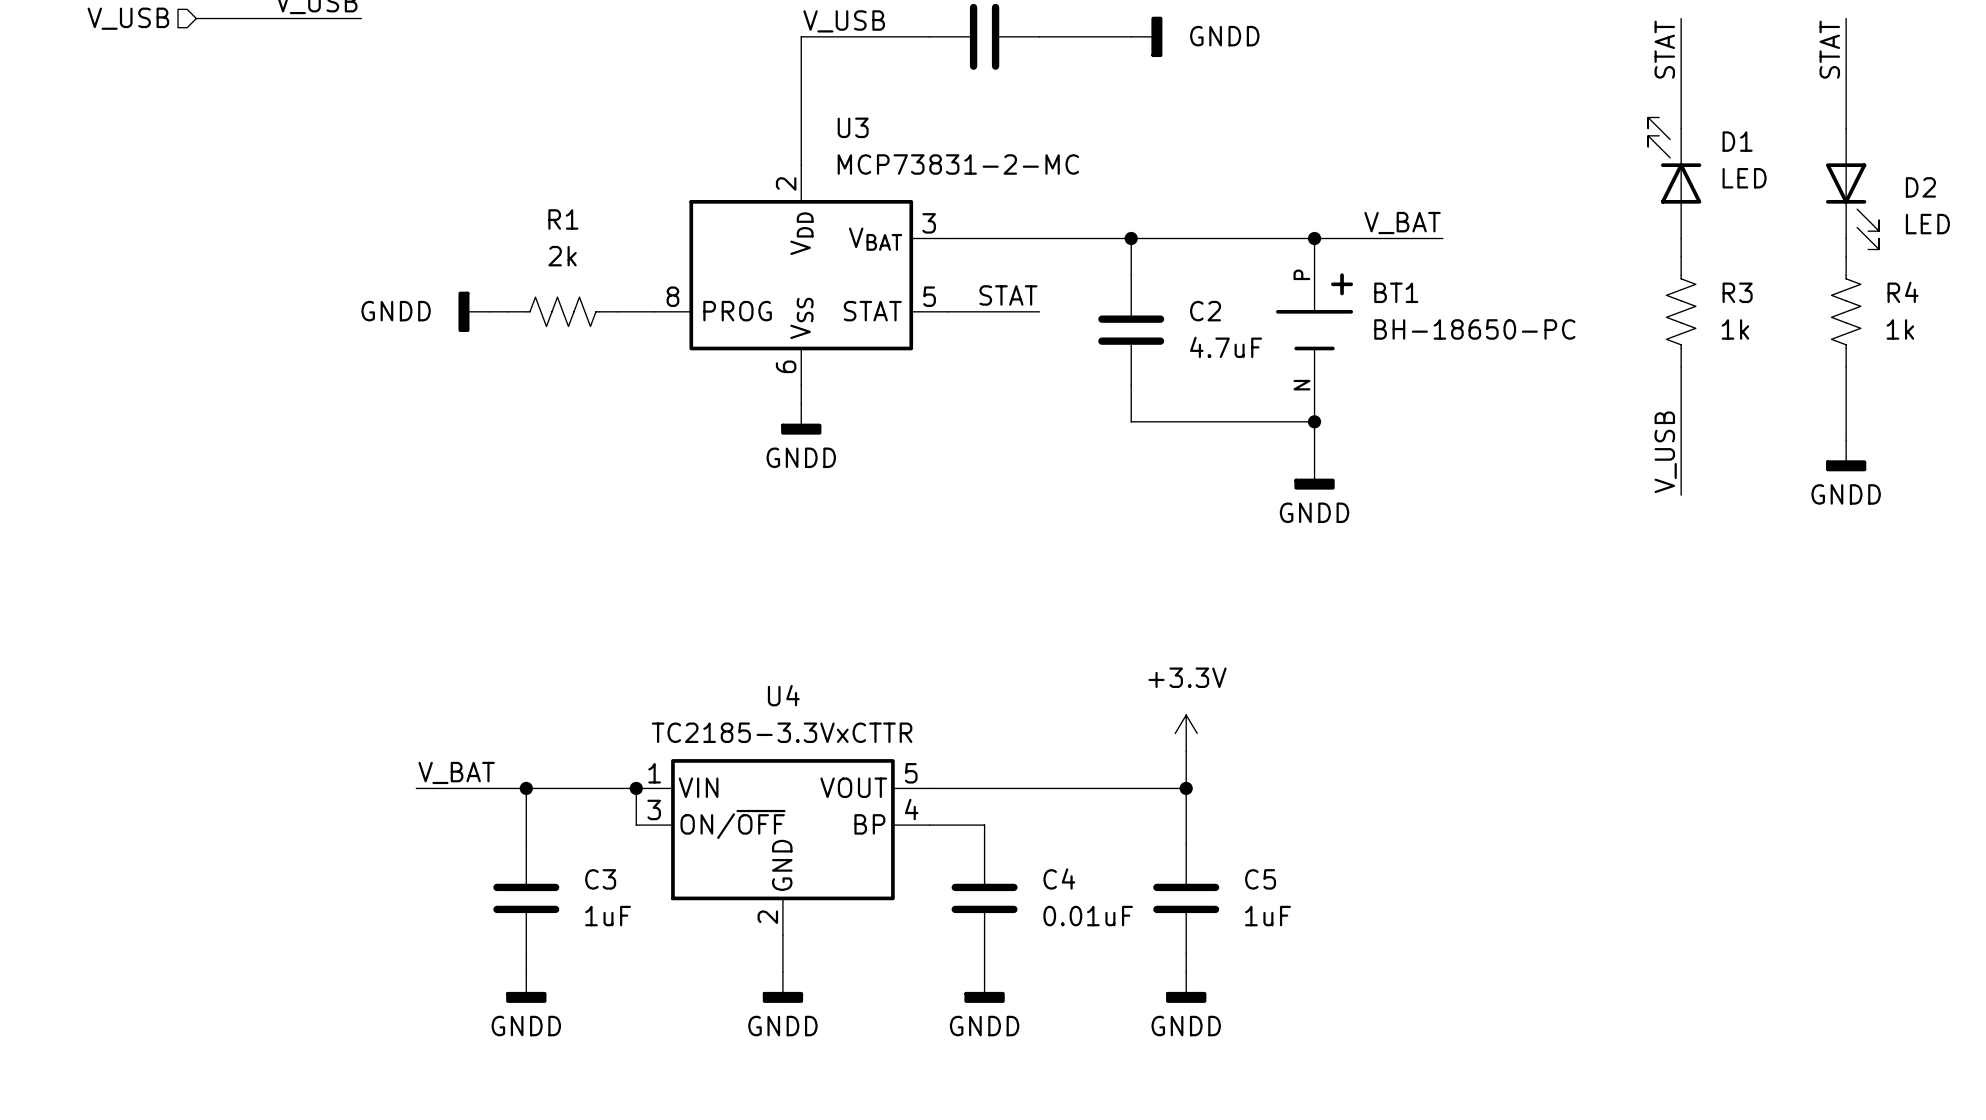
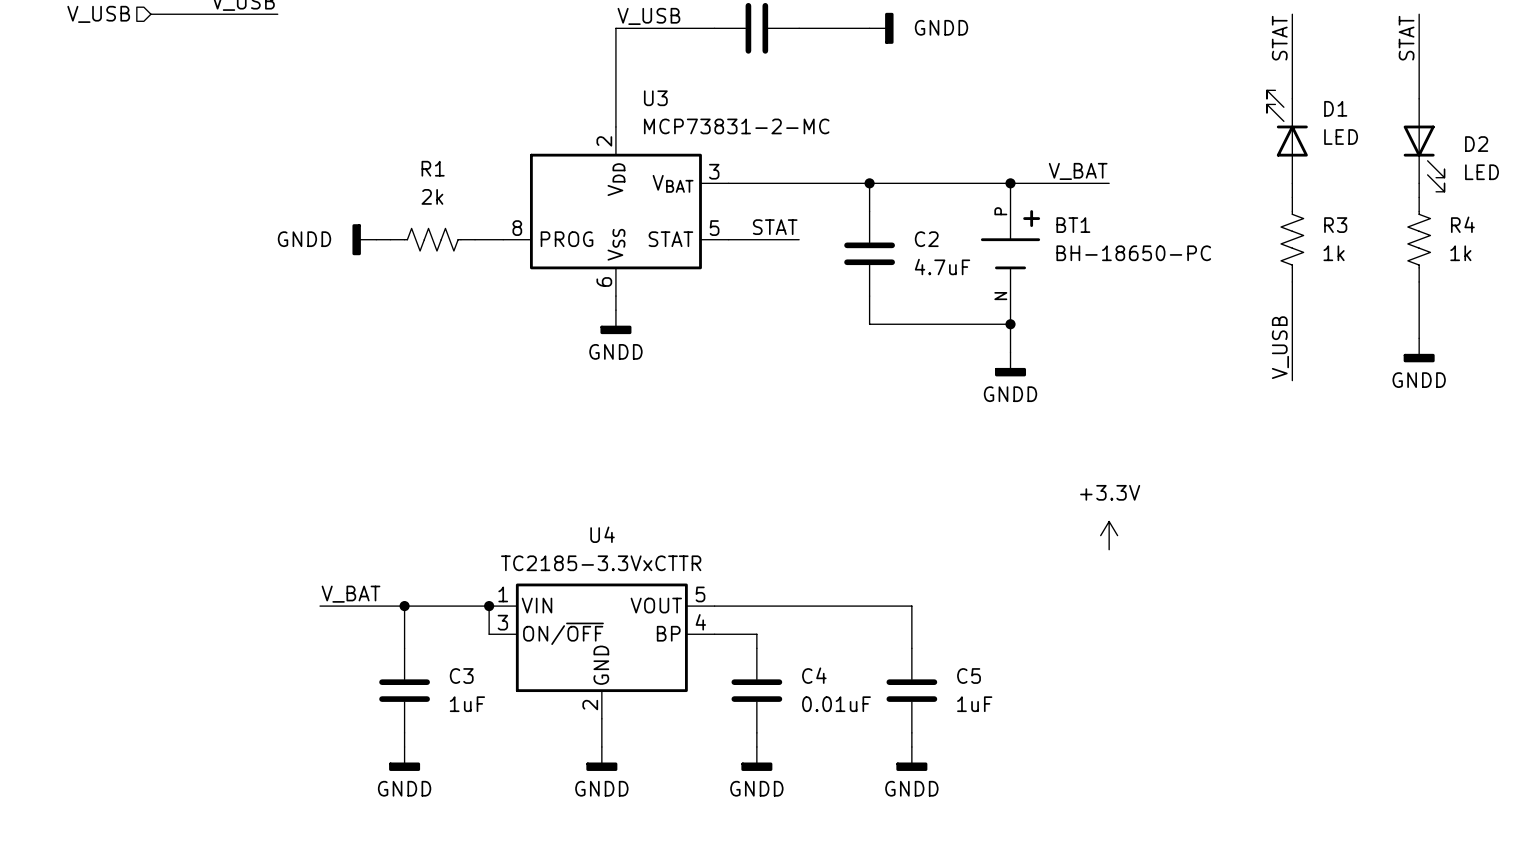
power symbol position: +3.3V (1186, 733) -> +3.3V (1109, 535)
wire: (1186, 751) (1186, 788) -> none
junction: (1186, 788) -> none

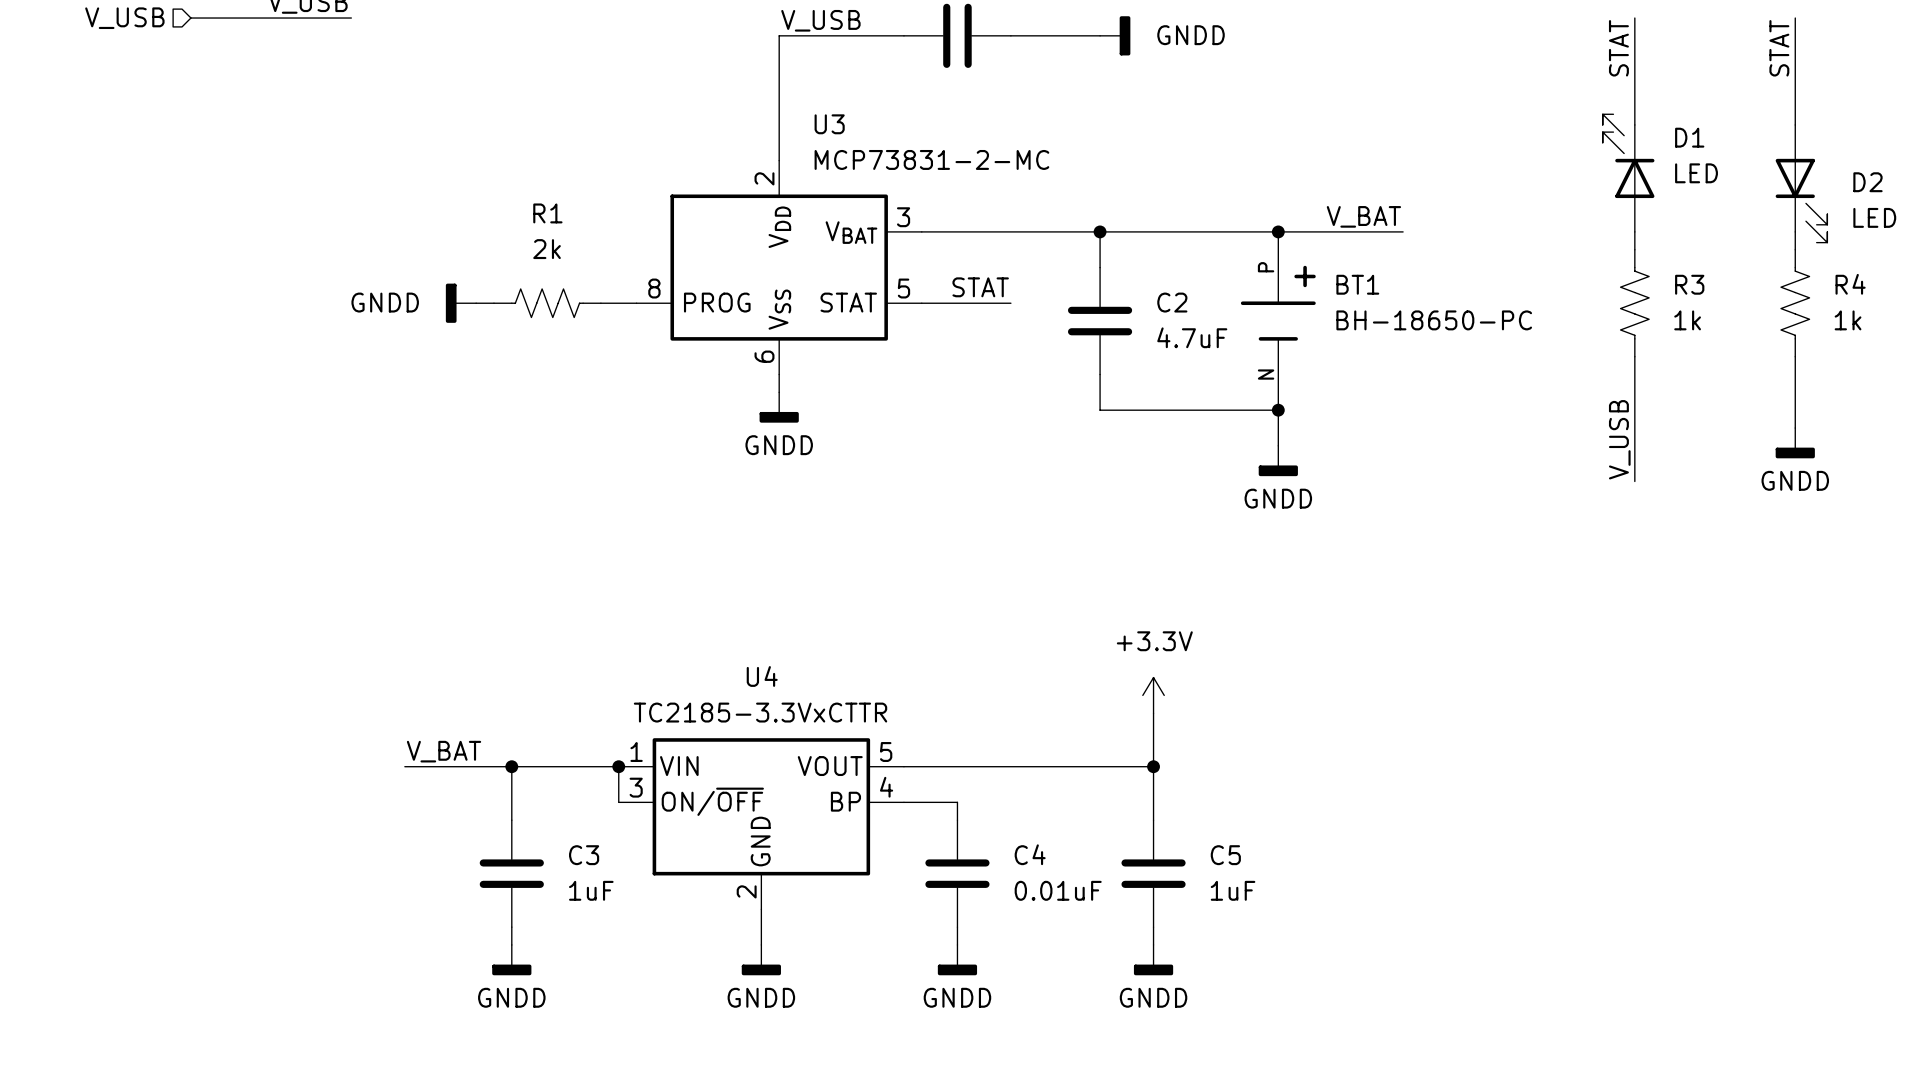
power symbol position: +3.3V (1109, 535) -> +3.3V (1153, 695)
wire: none -> (1153, 713) (1153, 766)
junction: none -> (1153, 766)

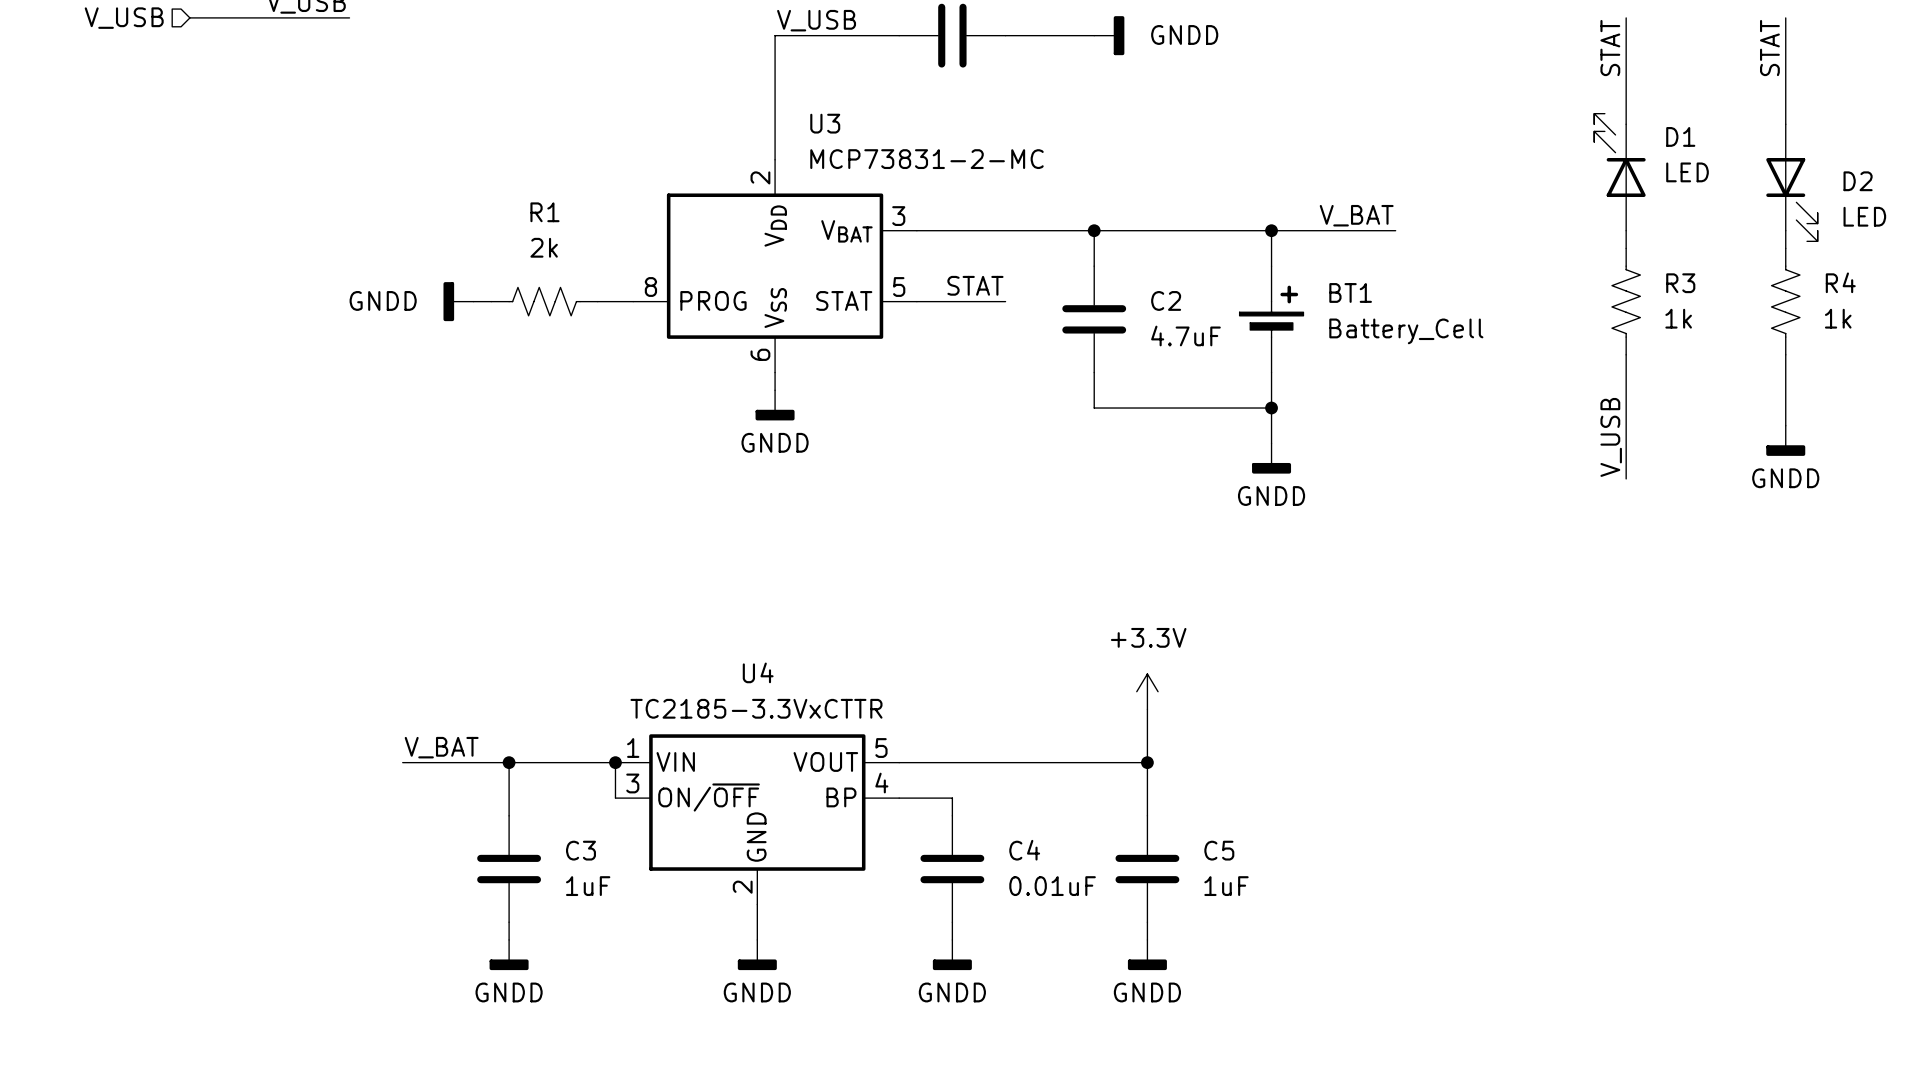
BT1 symbol: [1240, 231, 1316, 411] -> [1239, 266, 1304, 373]
BT1 value: BH-18650-PC (1434, 320) -> Battery_Cell (1406, 331)

